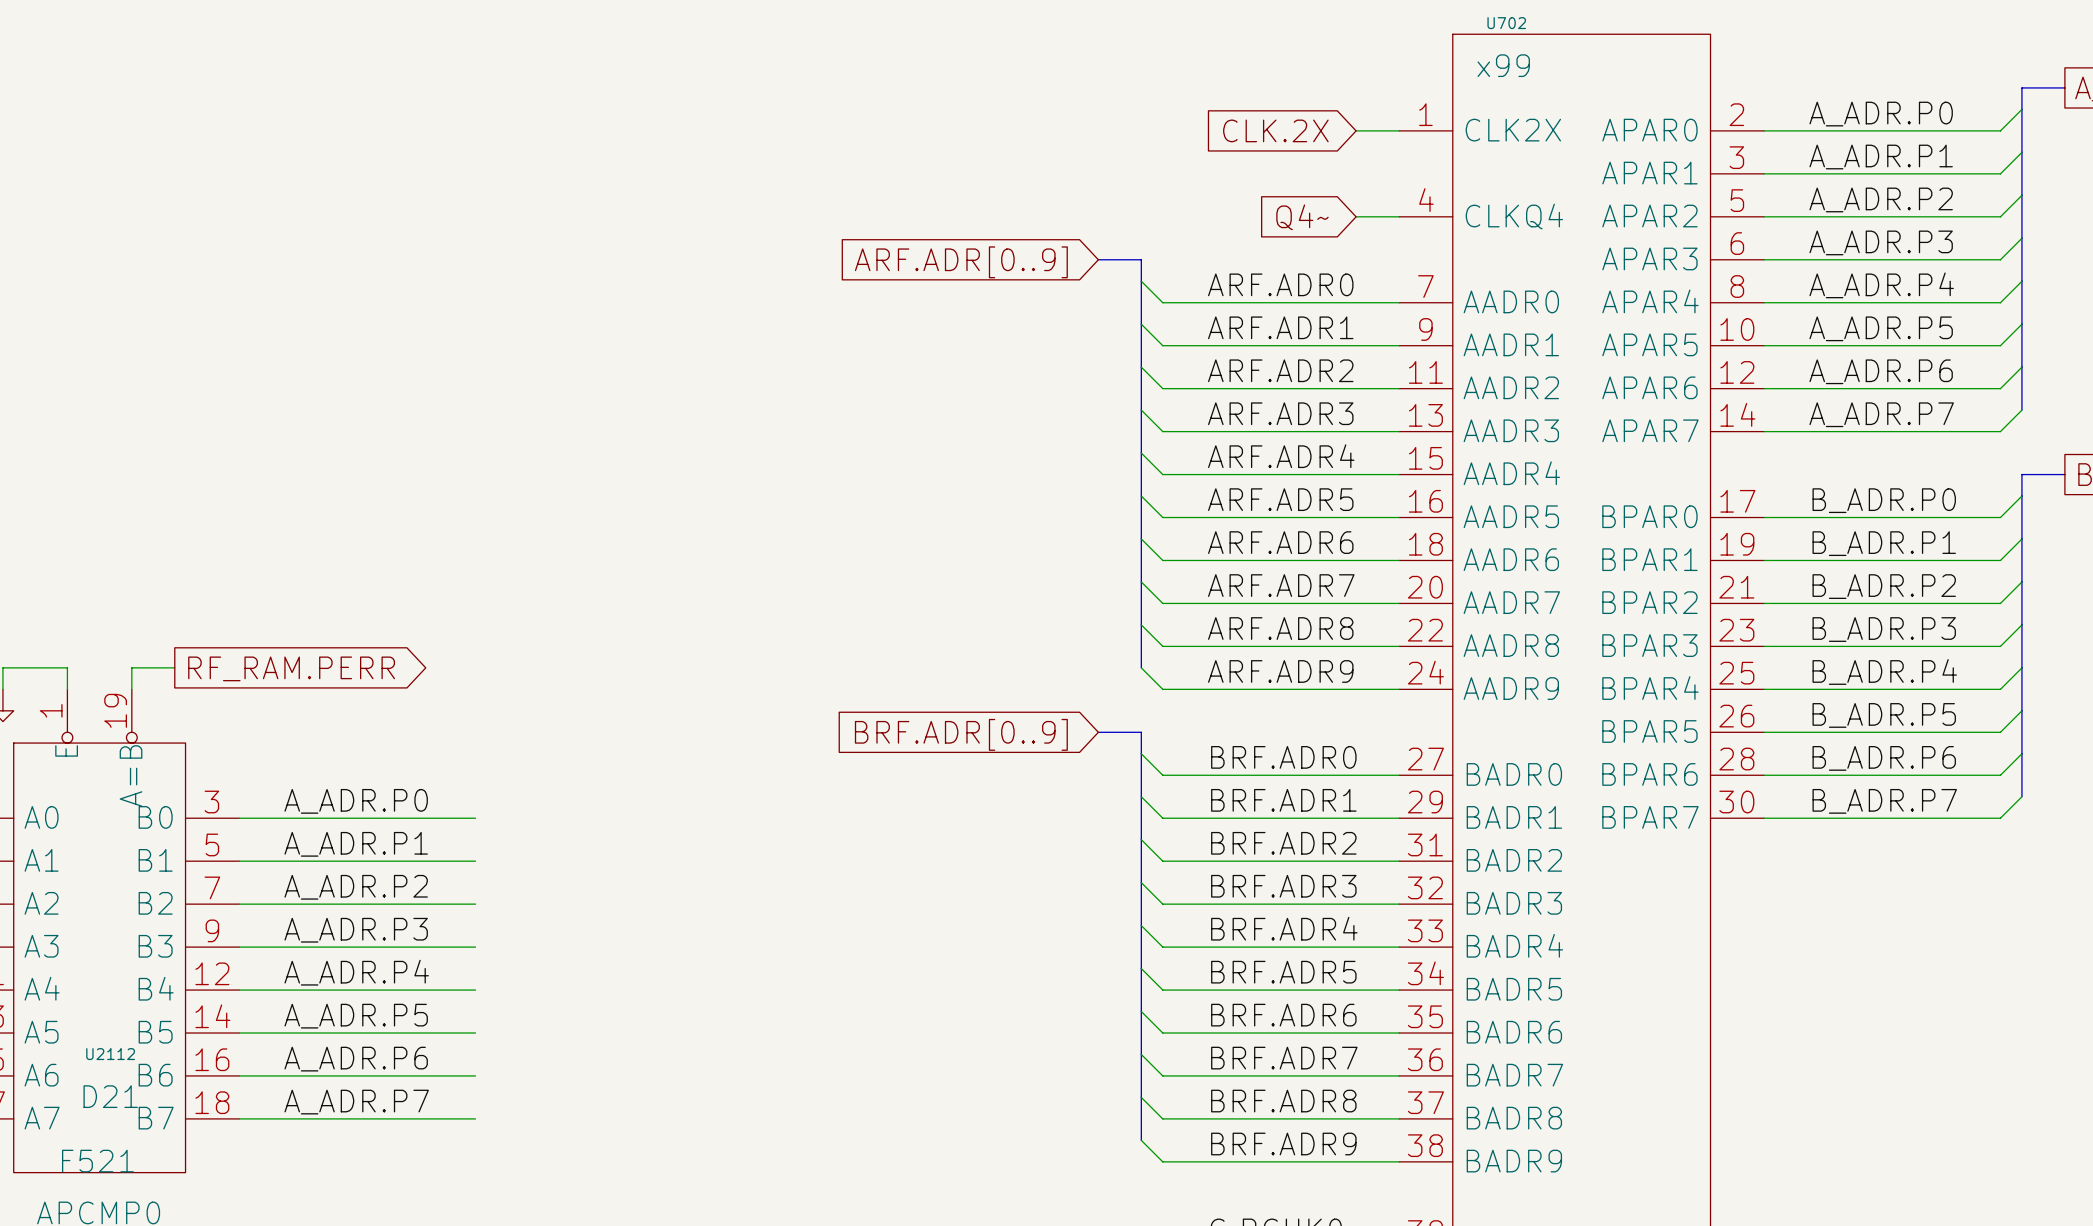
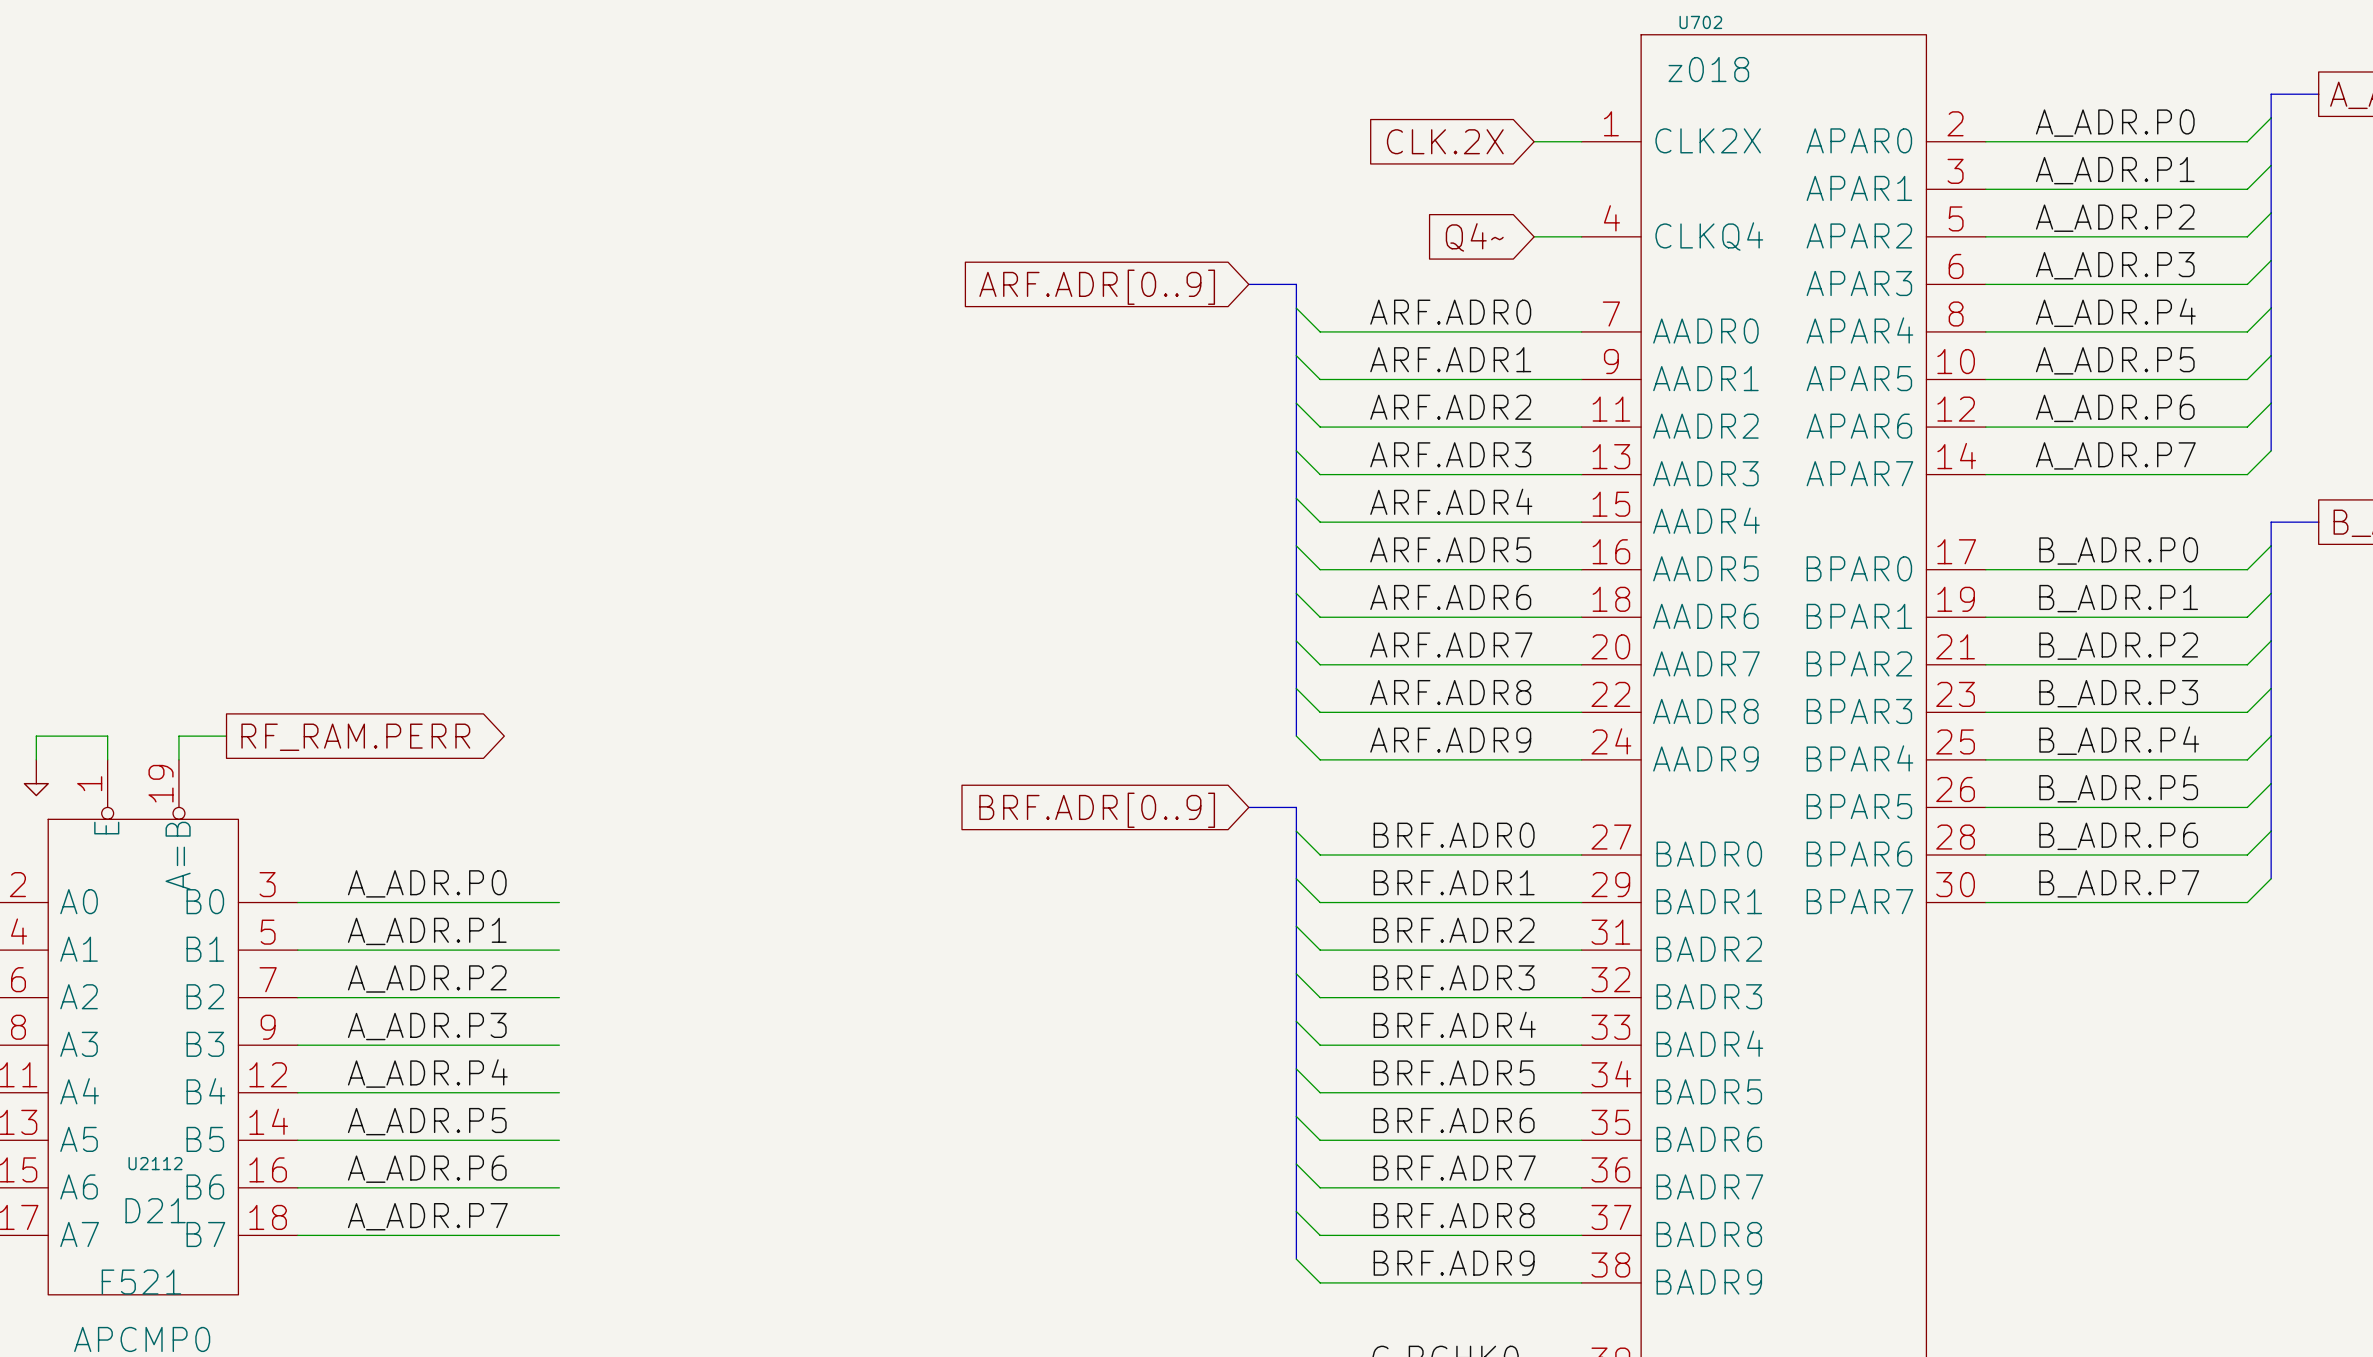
U702 text: x99 (1503, 65) -> z018 (1708, 69)

